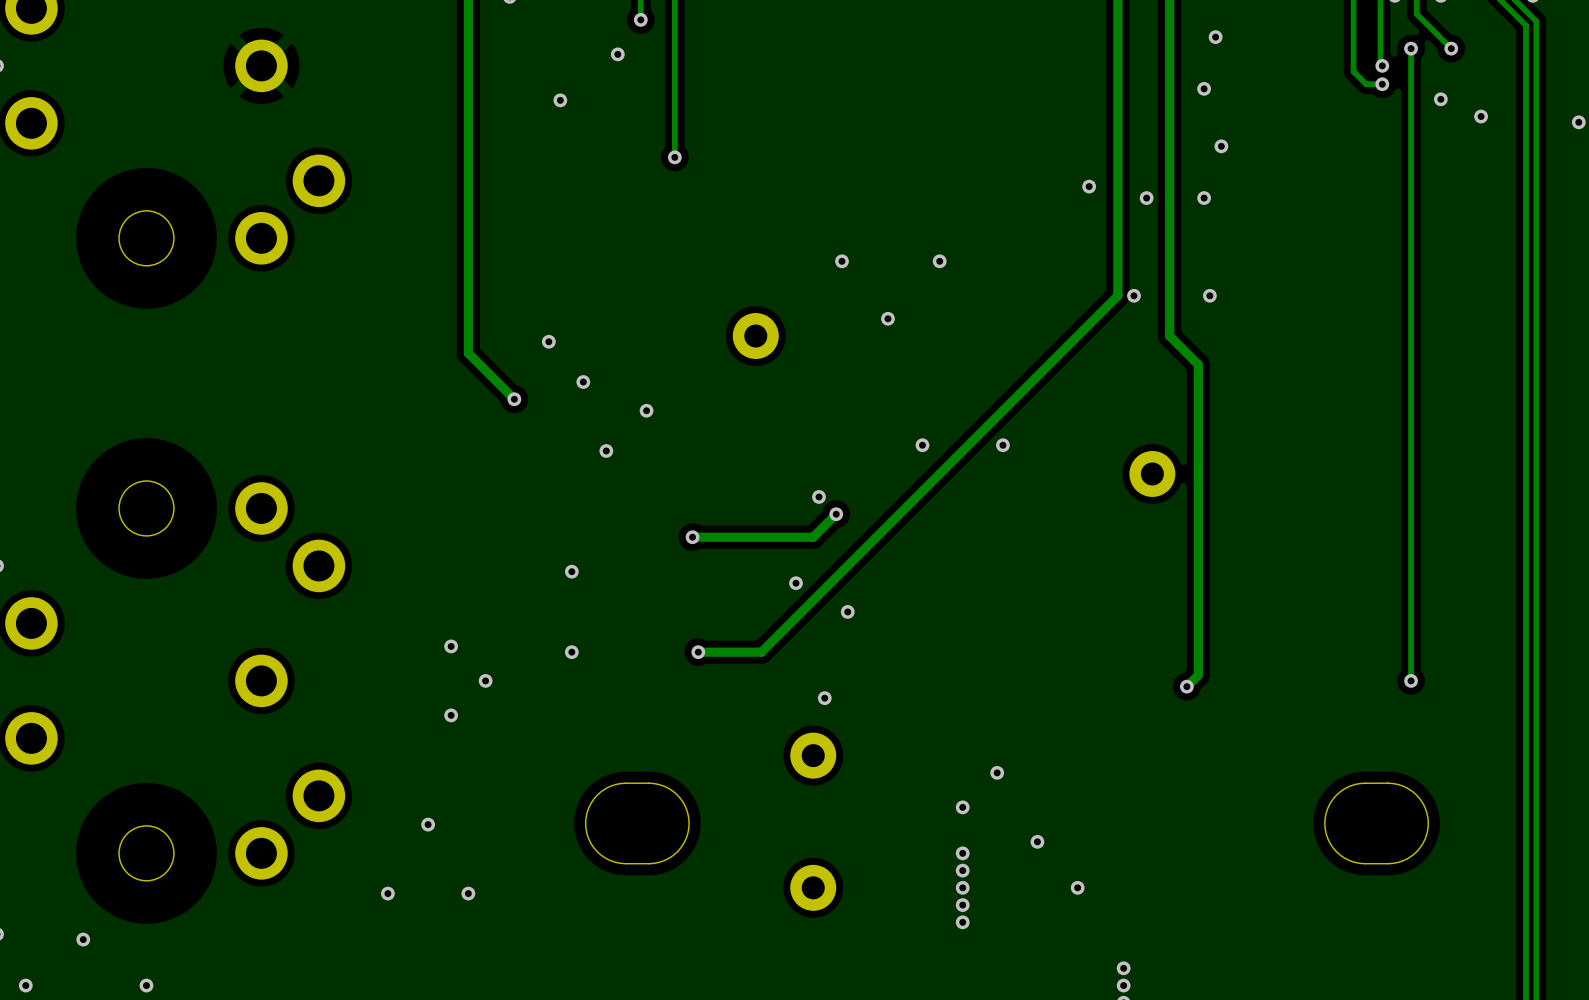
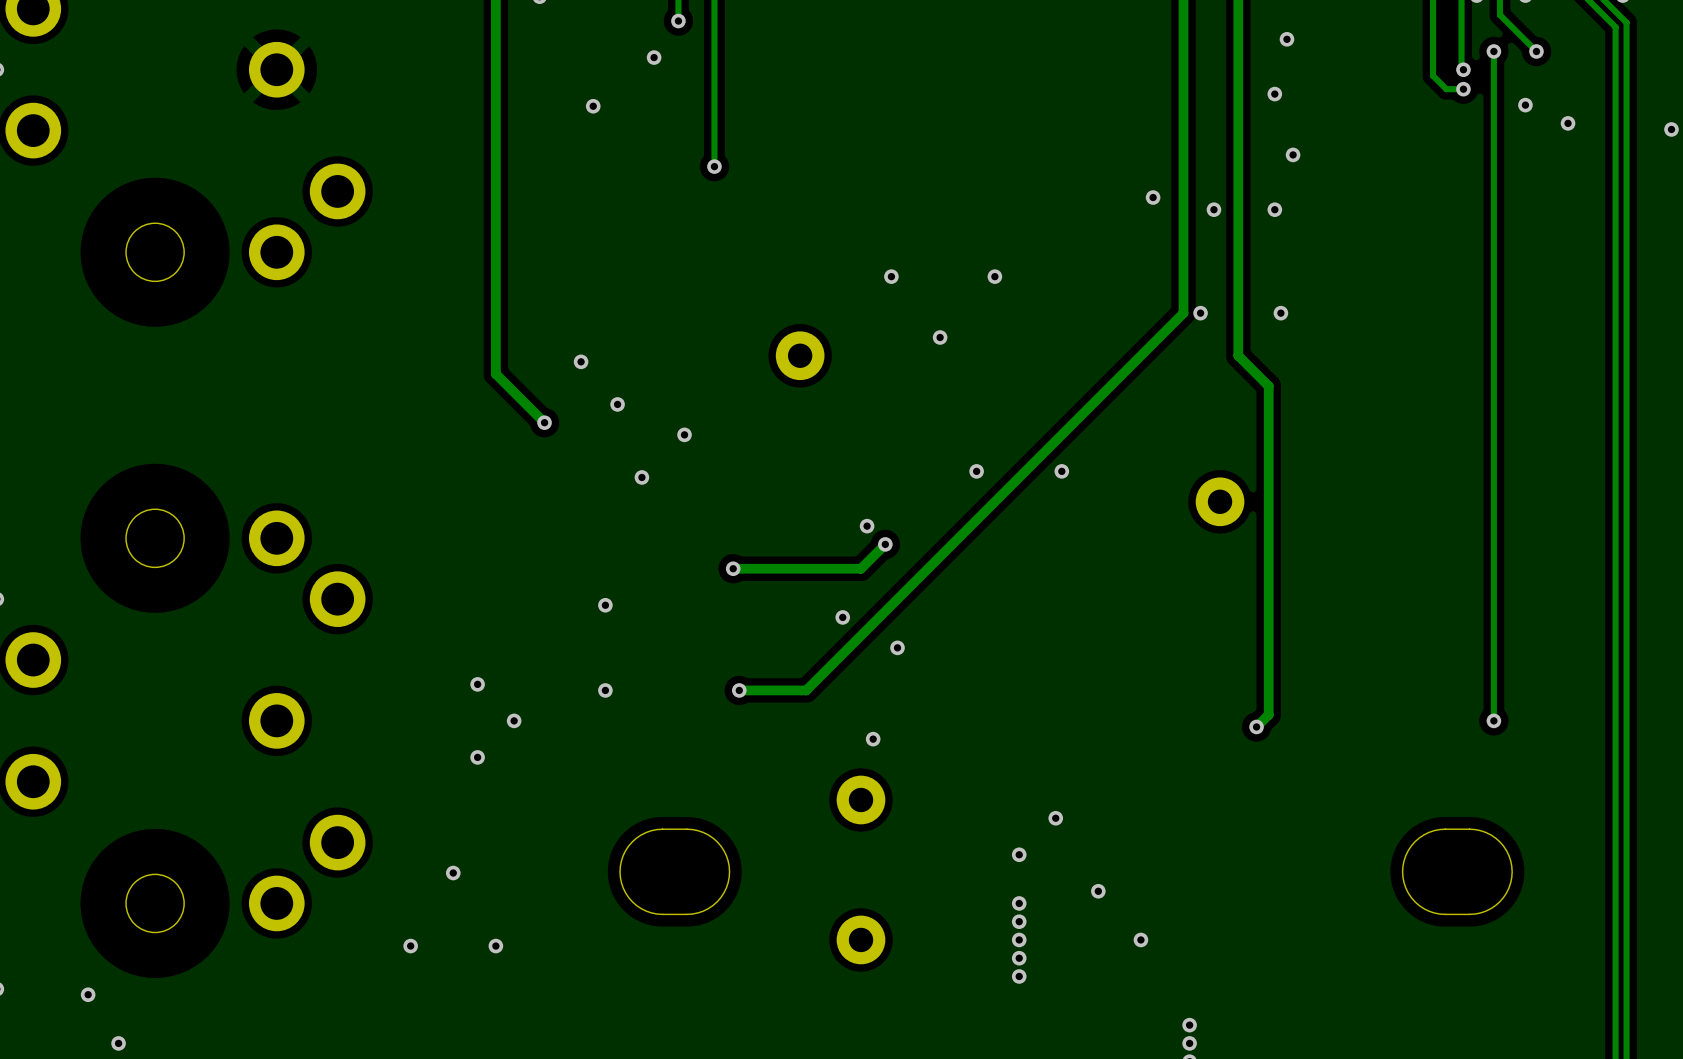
via: (25, 985) -> none
via position: (146, 985) -> (118, 1043)

